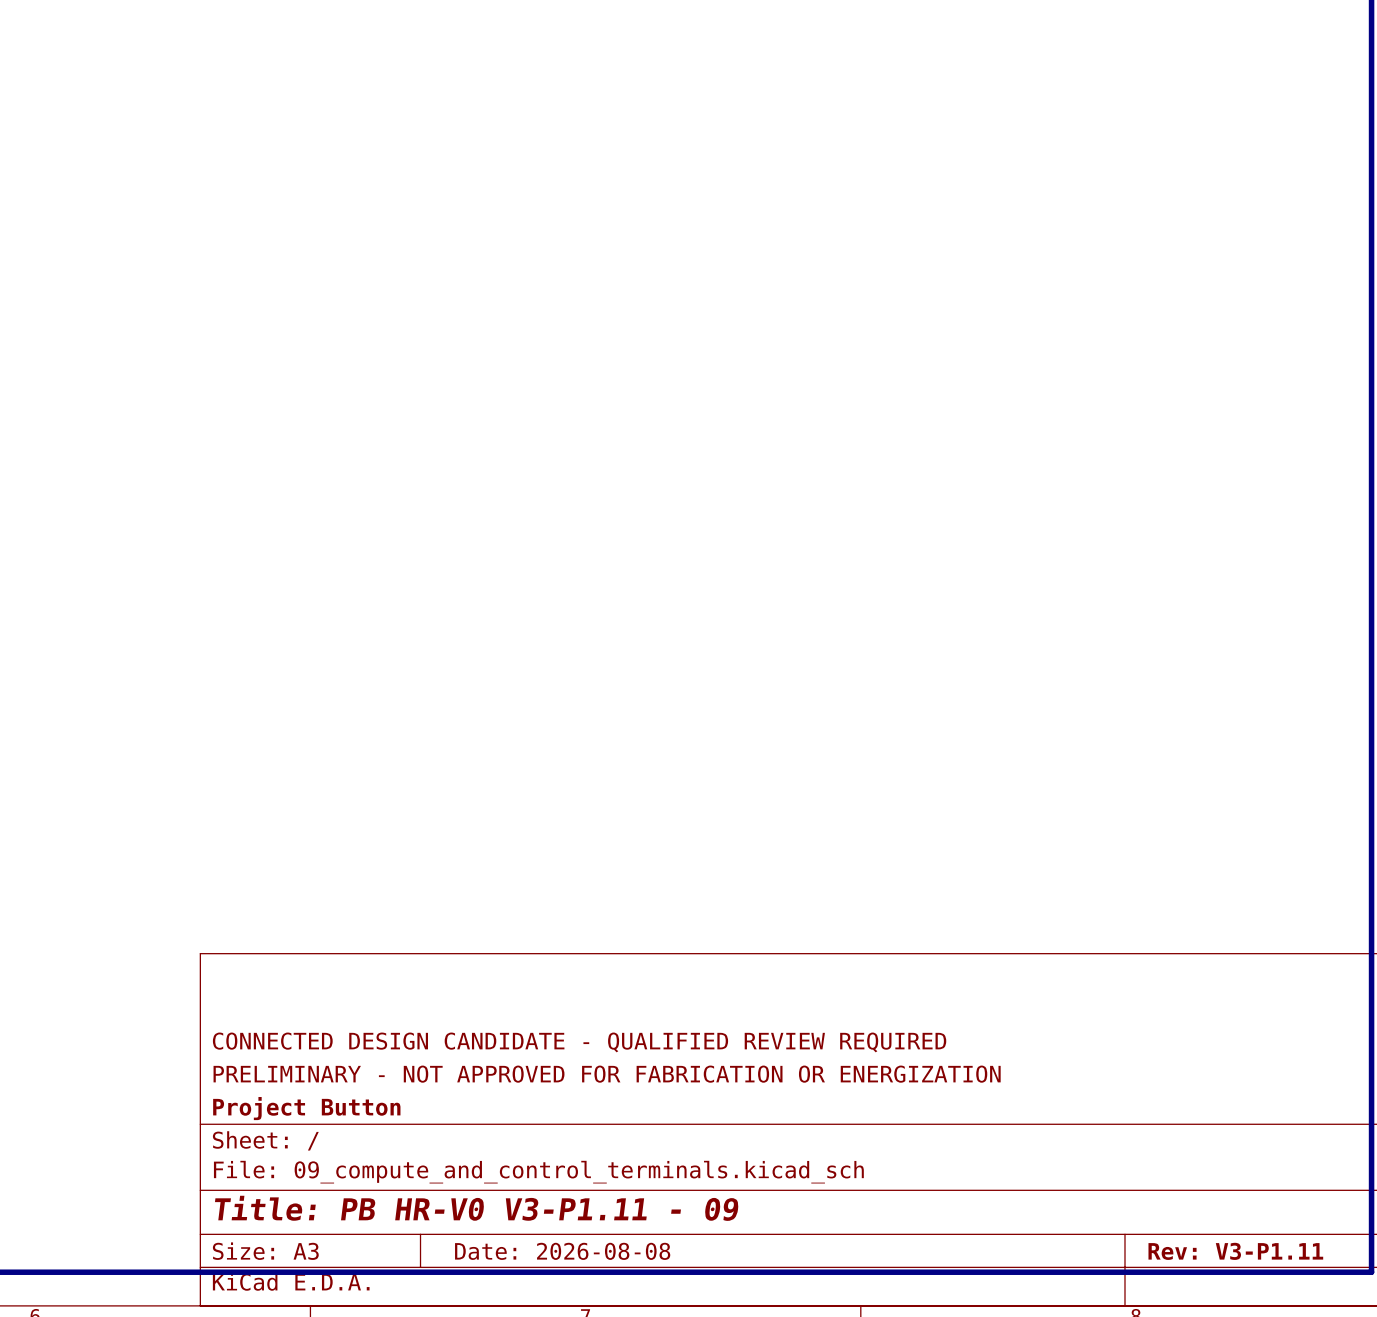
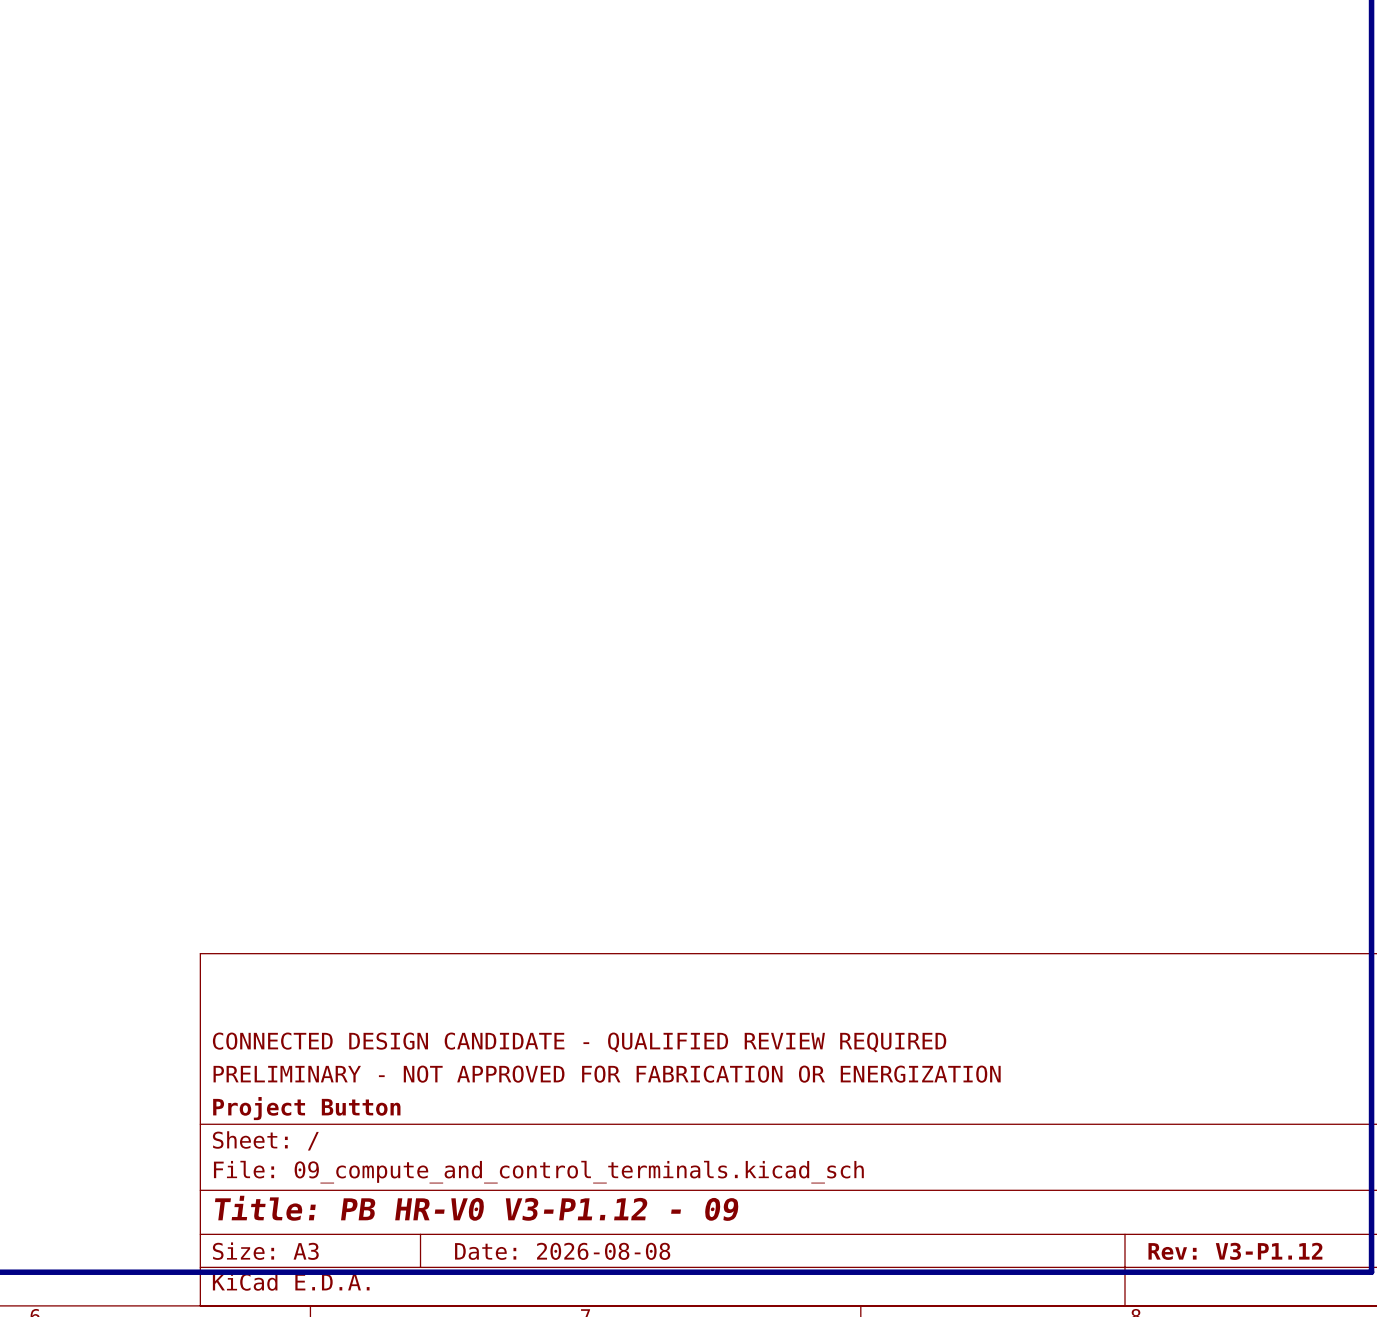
title block: Title: PB HR-V0 V3-P1.11 - 09 (476, 1208) -> Title: PB HR-V0 V3-P1.12 - 09 (476, 1208)
title block: Rev: V3-P1.11 (1235, 1251) -> Rev: V3-P1.12 (1235, 1251)

